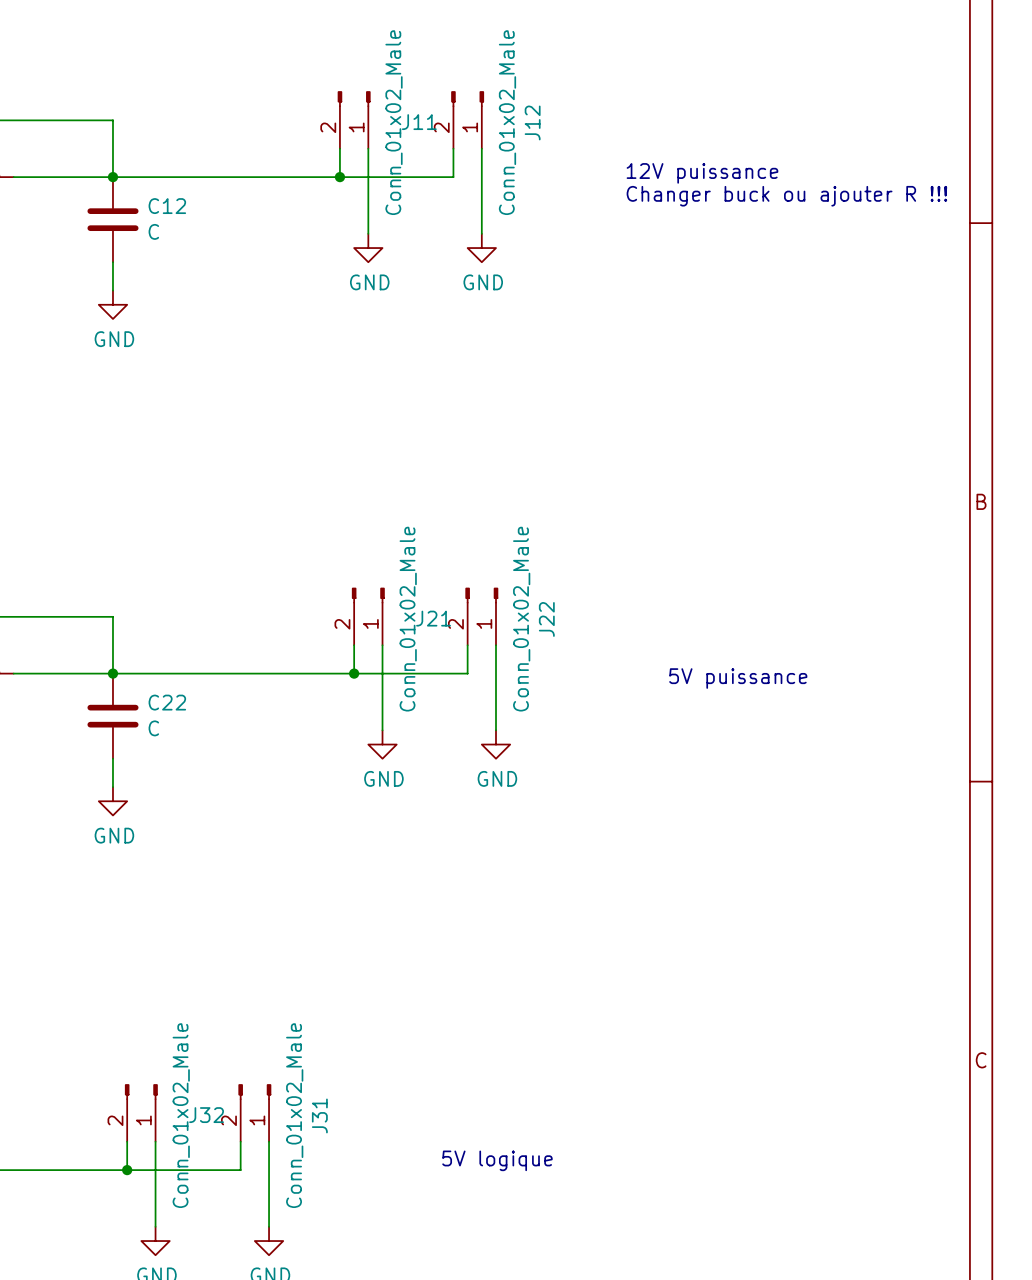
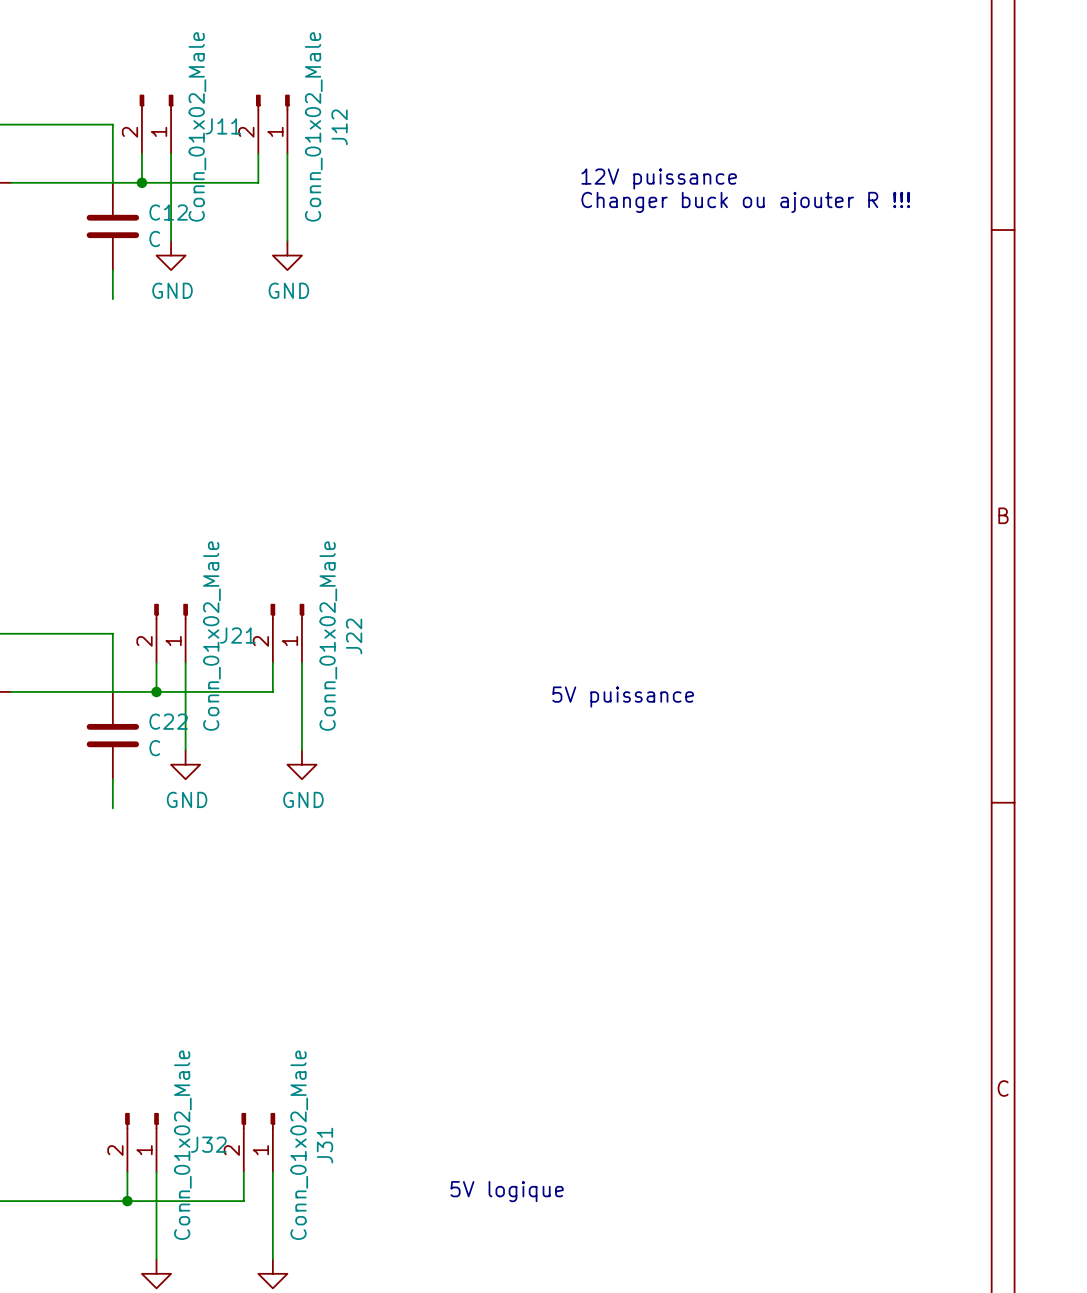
J11 position: (354, 119) -> (156, 124)
J12 position: (467, 119) -> (272, 124)
wire: (339, 148) (339, 177) -> (141, 153) (141, 182)
wire: (368, 148) (368, 233) -> (171, 153) (171, 241)
wire: (453, 148) (453, 177) (254, 177) -> (258, 153) (258, 182)
wire: (481, 148) (481, 233) -> (287, 153) (287, 241)
text position: 12V puissance (702, 173) -> 12V puissance (659, 178)
junction position: (112, 177) -> (141, 182)
junction: (339, 177) -> none
text position: Changer buck ou ajouter R !!! (786, 196) -> Changer buck ou ajouter R !!! (745, 202)
power symbol position: GND (368, 248) -> GND (287, 255)
power symbol: GND (481, 248) -> none
power symbol position: GND (112, 304) -> GND (171, 255)
J21 position: (368, 616) -> (171, 633)
J22 position: (481, 616) -> (287, 633)
wire: (354, 645) (354, 673) -> (156, 662) (156, 691)
wire: (382, 645) (382, 730) -> (185, 662) (185, 750)
wire: (467, 645) (467, 673) (269, 673) -> (272, 662) (272, 691)
wire: (496, 645) (496, 730) -> (301, 662) (301, 750)
junction position: (112, 673) -> (156, 691)
junction: (354, 673) -> none
text position: 5V puissance (738, 678) -> 5V puissance (623, 697)
power symbol position: GND (382, 744) -> GND (301, 764)
power symbol: GND (496, 744) -> none
power symbol position: GND (112, 801) -> GND (185, 764)

